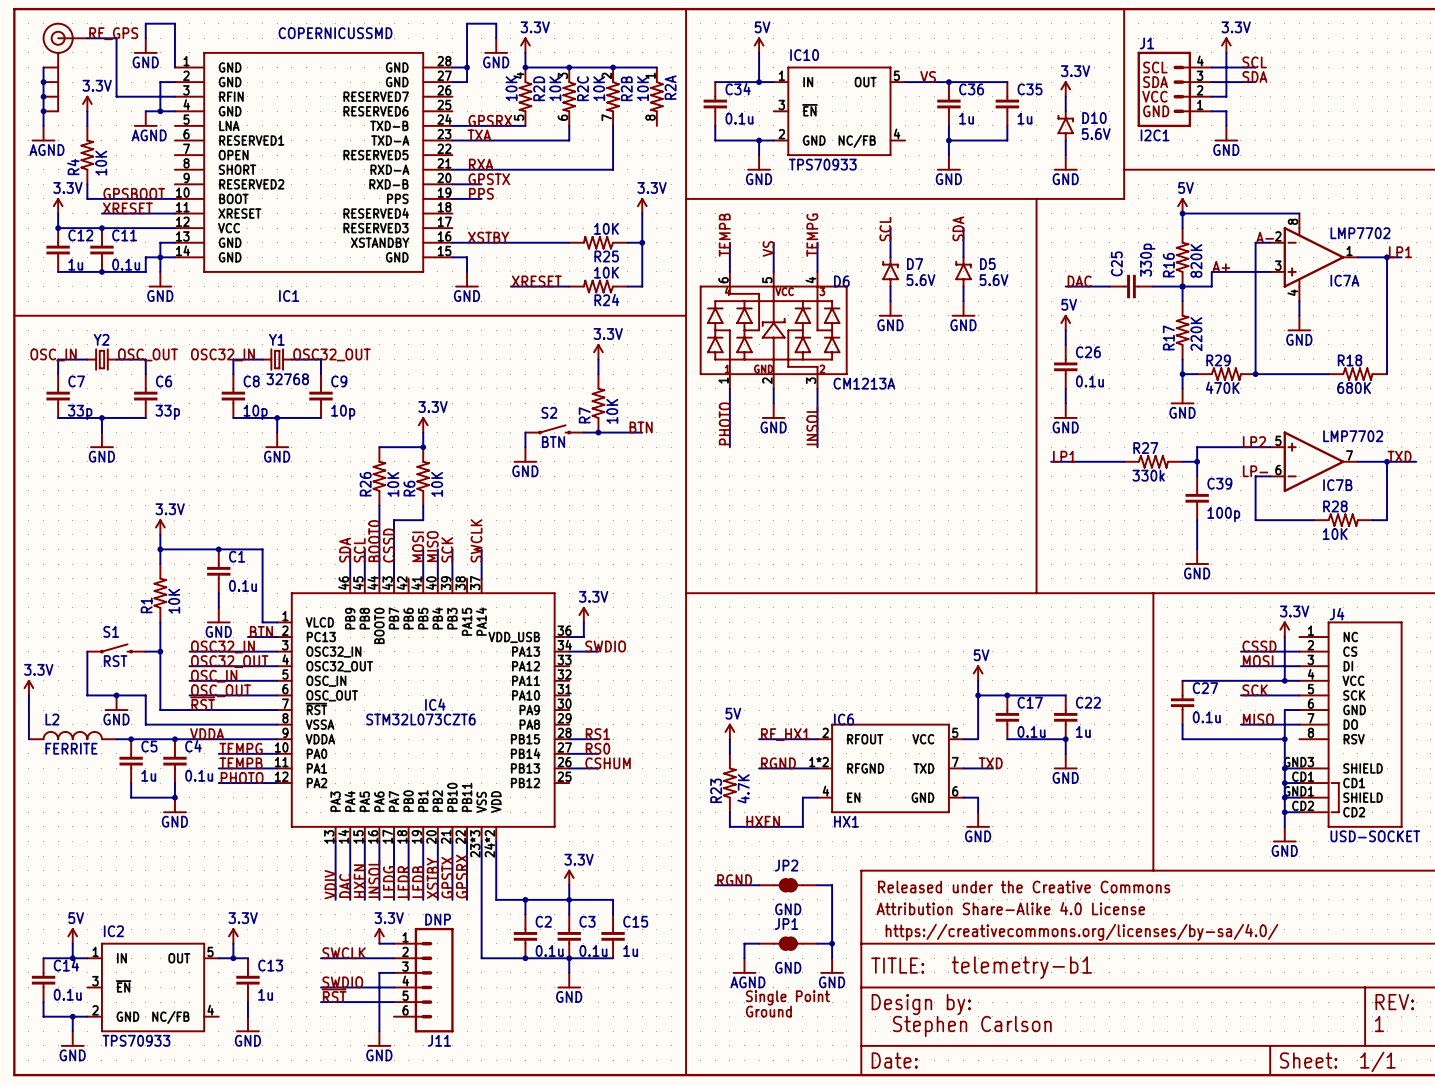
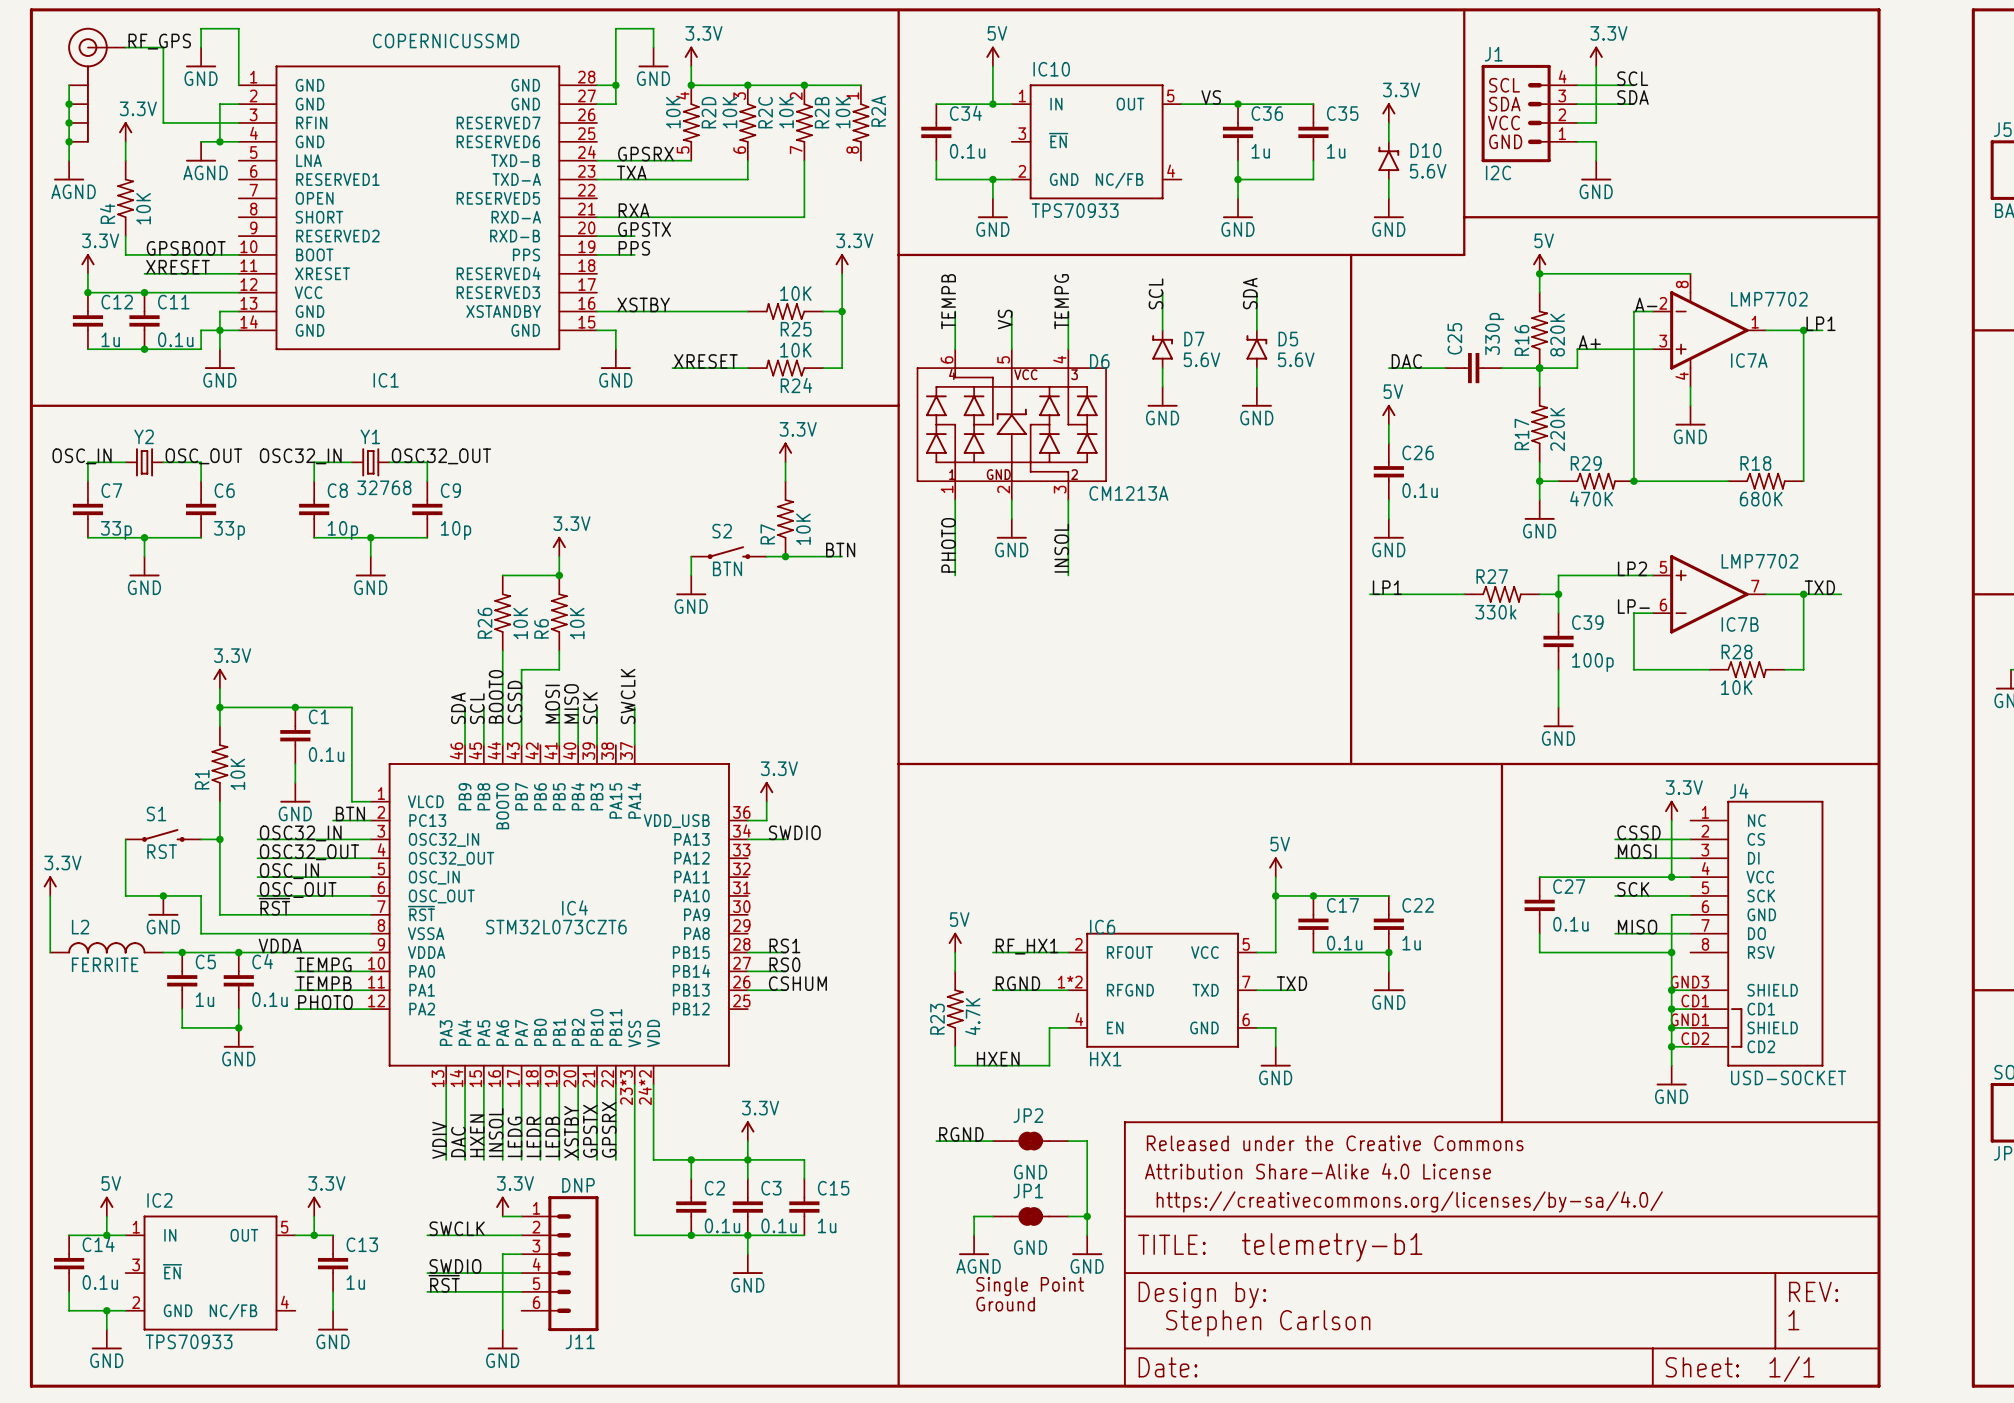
J1 value: I2C1 (1155, 135) -> I2C (1498, 172)

